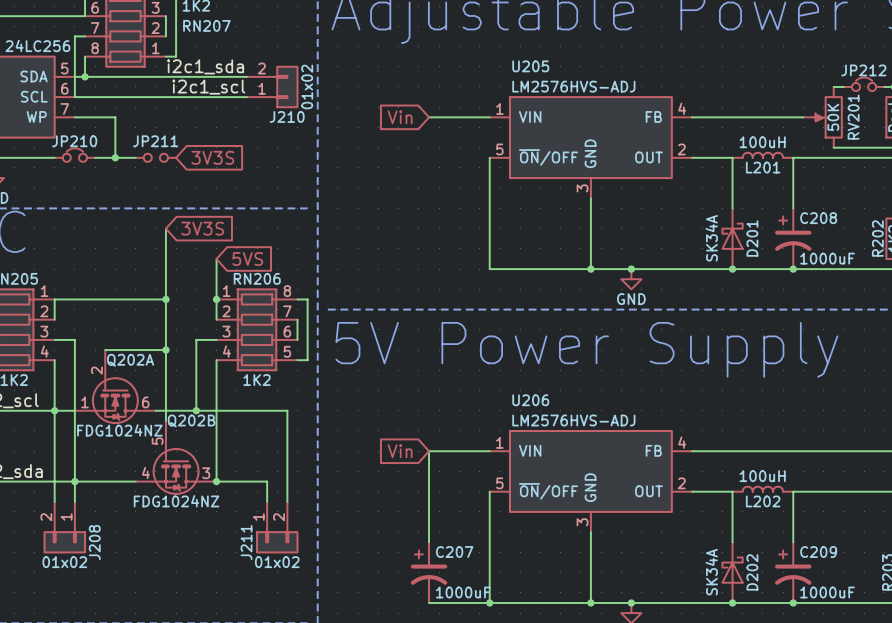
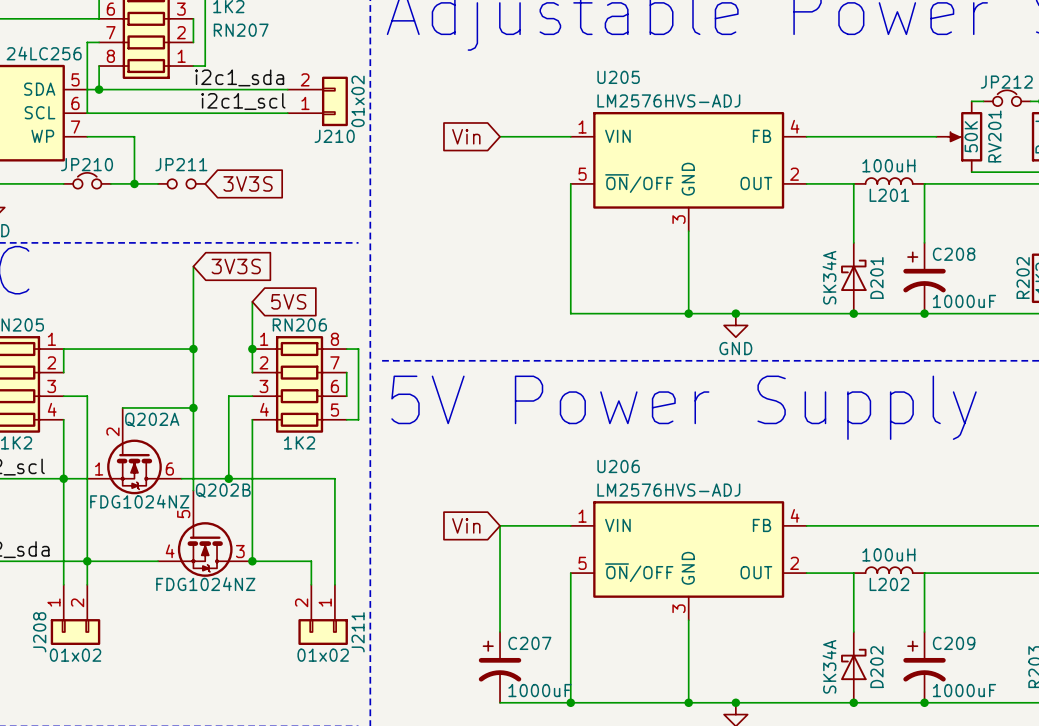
J208 flip: as is (64, 542) -> left-right (75, 632)
J211 flip: as is (277, 542) -> left-right (323, 632)

